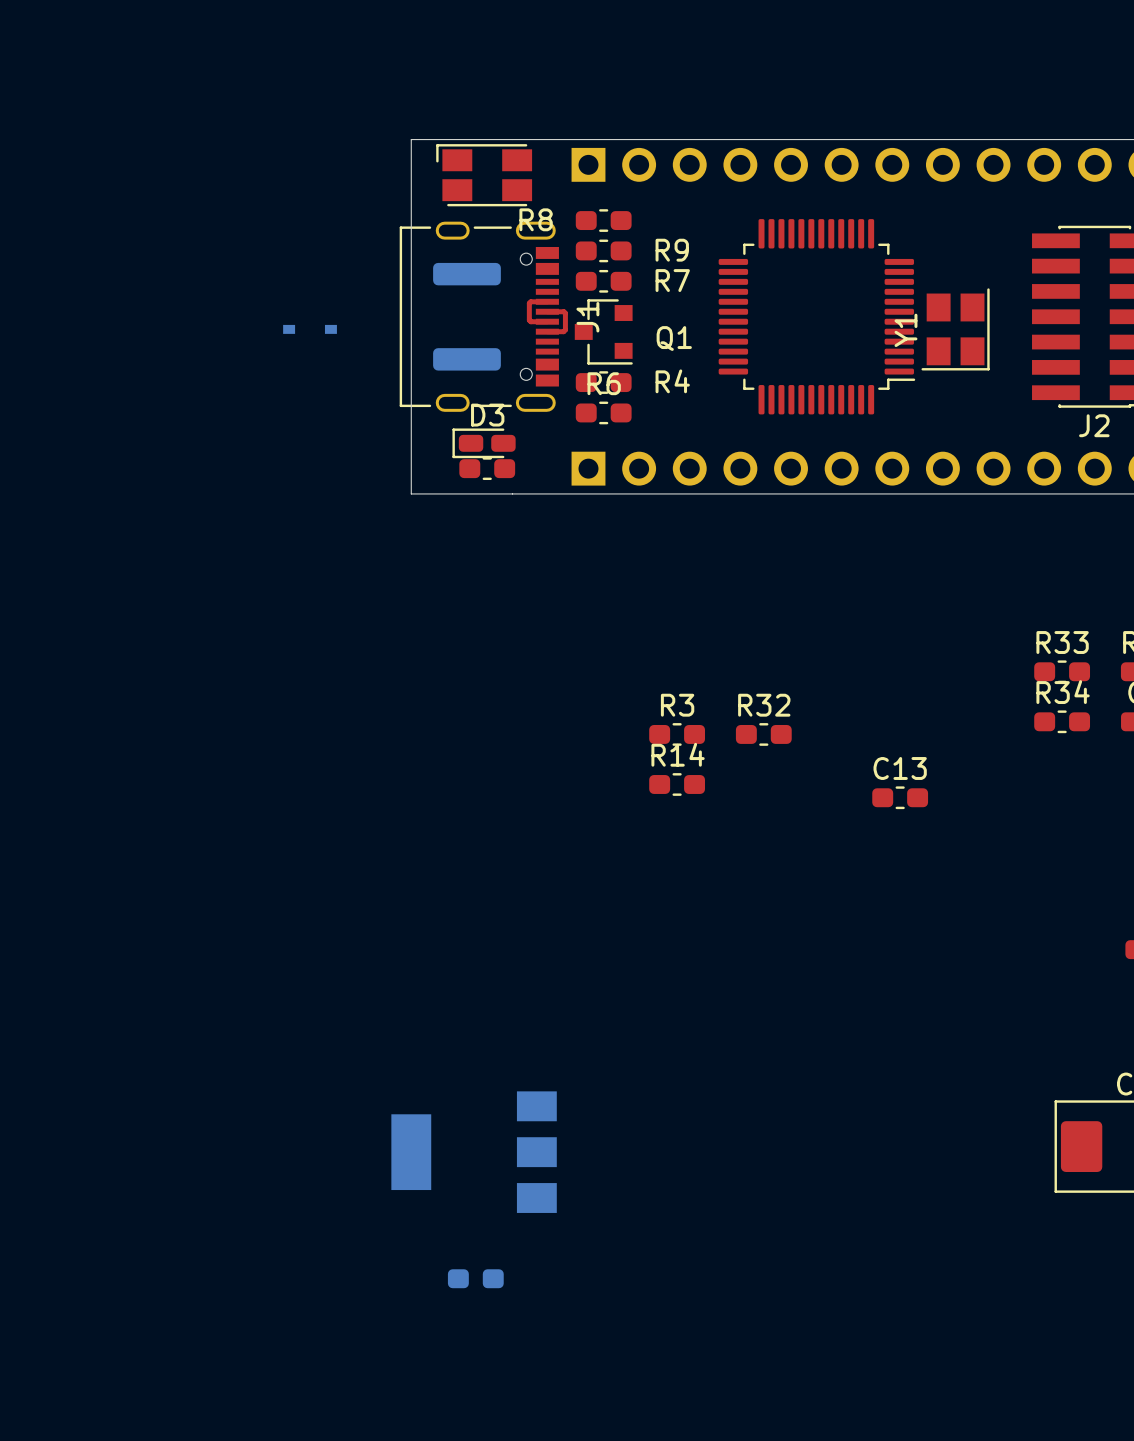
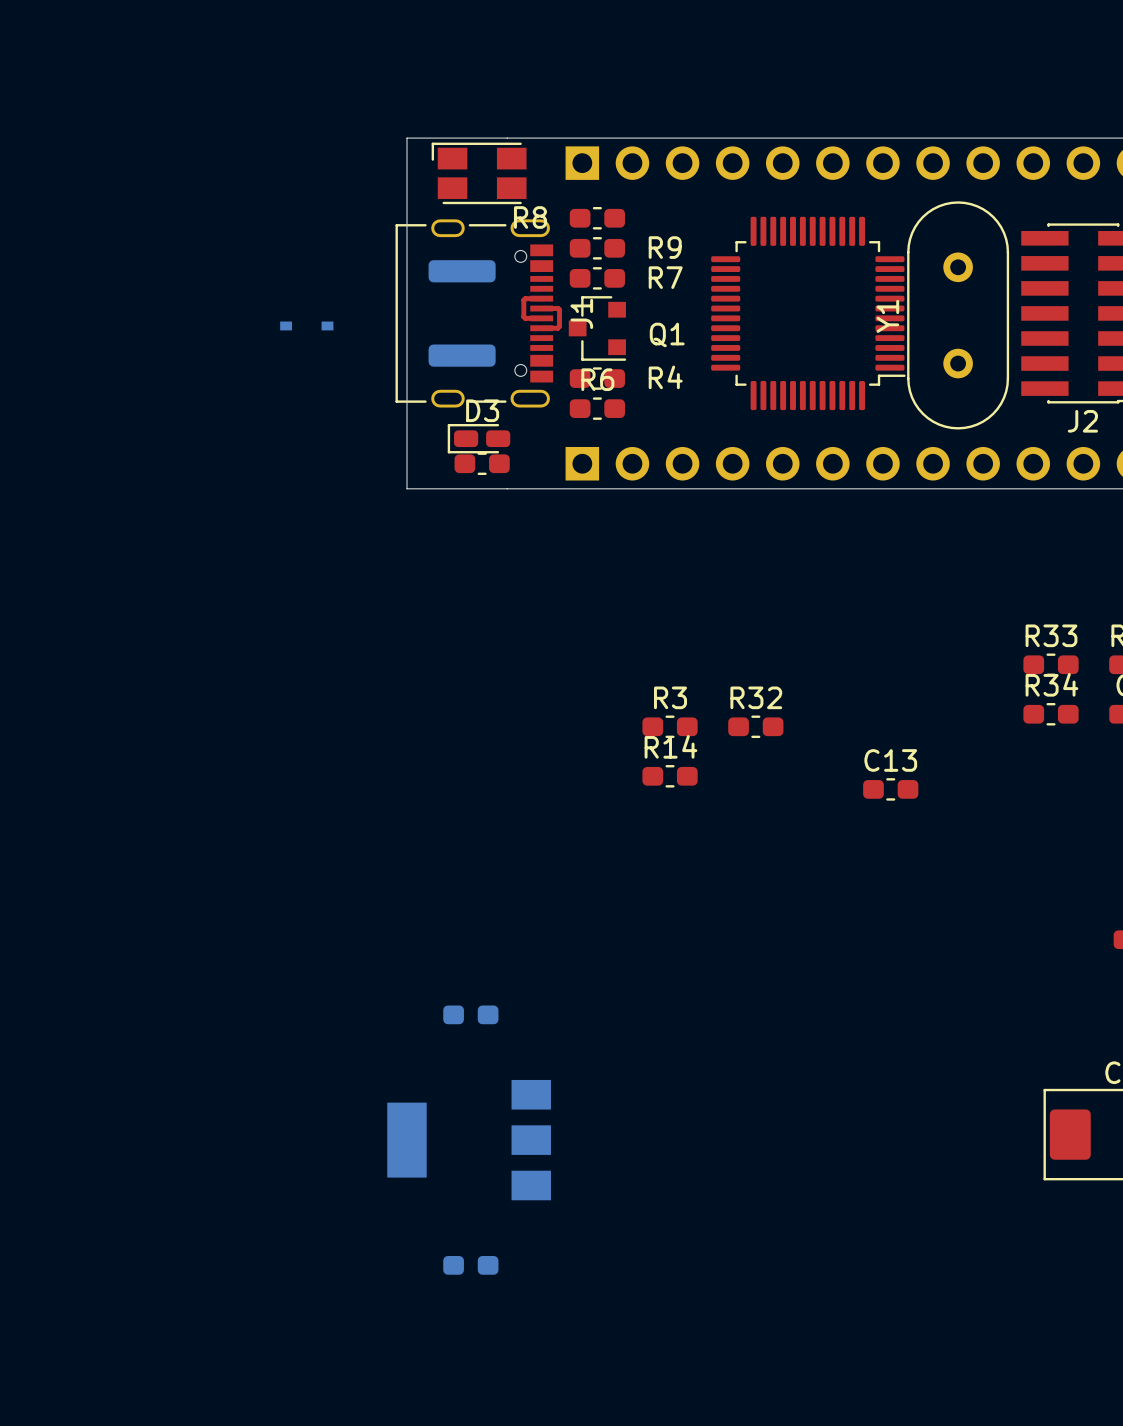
Y1 footprint: [921, 288, 990, 371] -> [907, 201, 1010, 430]
part: none -> (470, 1014)

